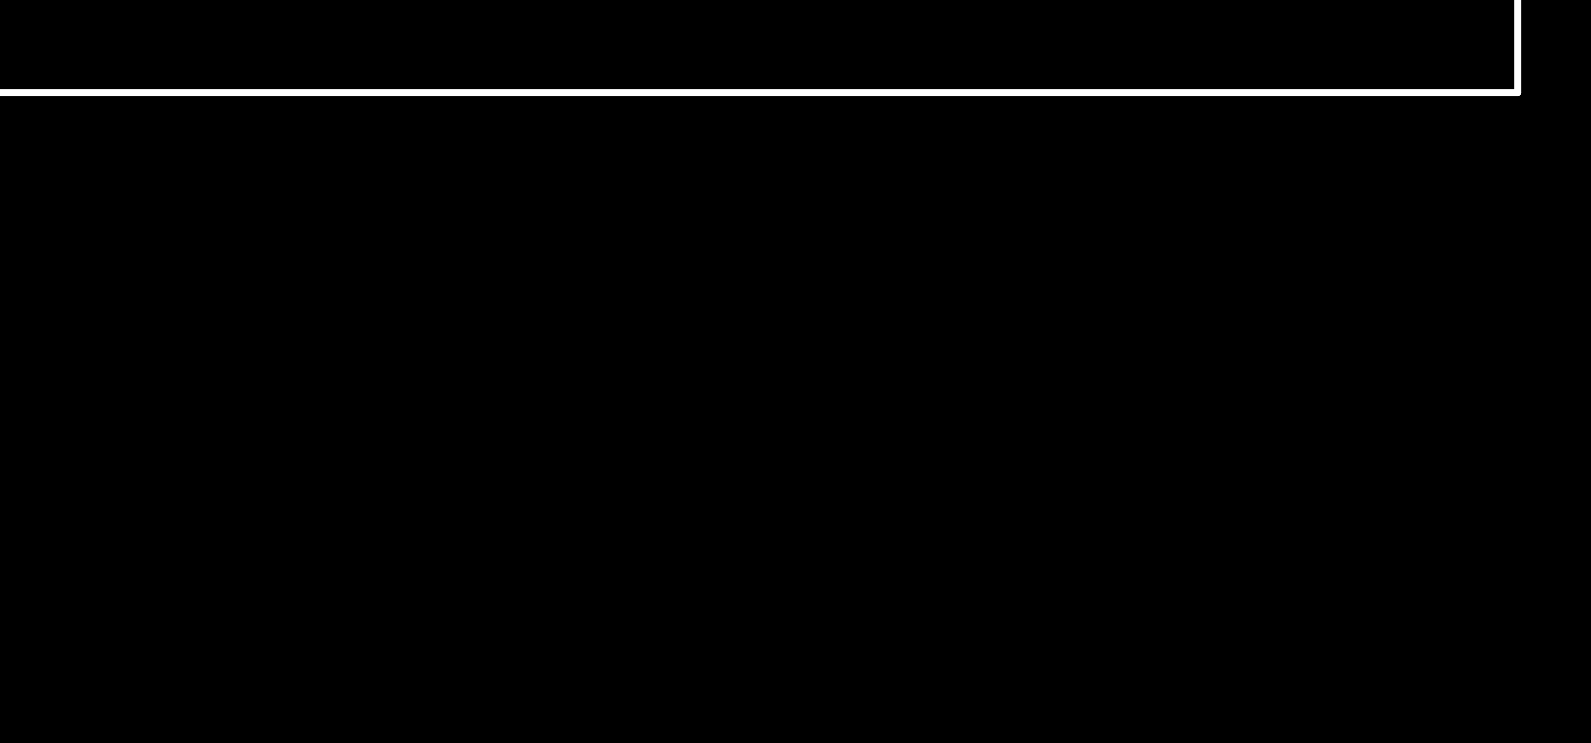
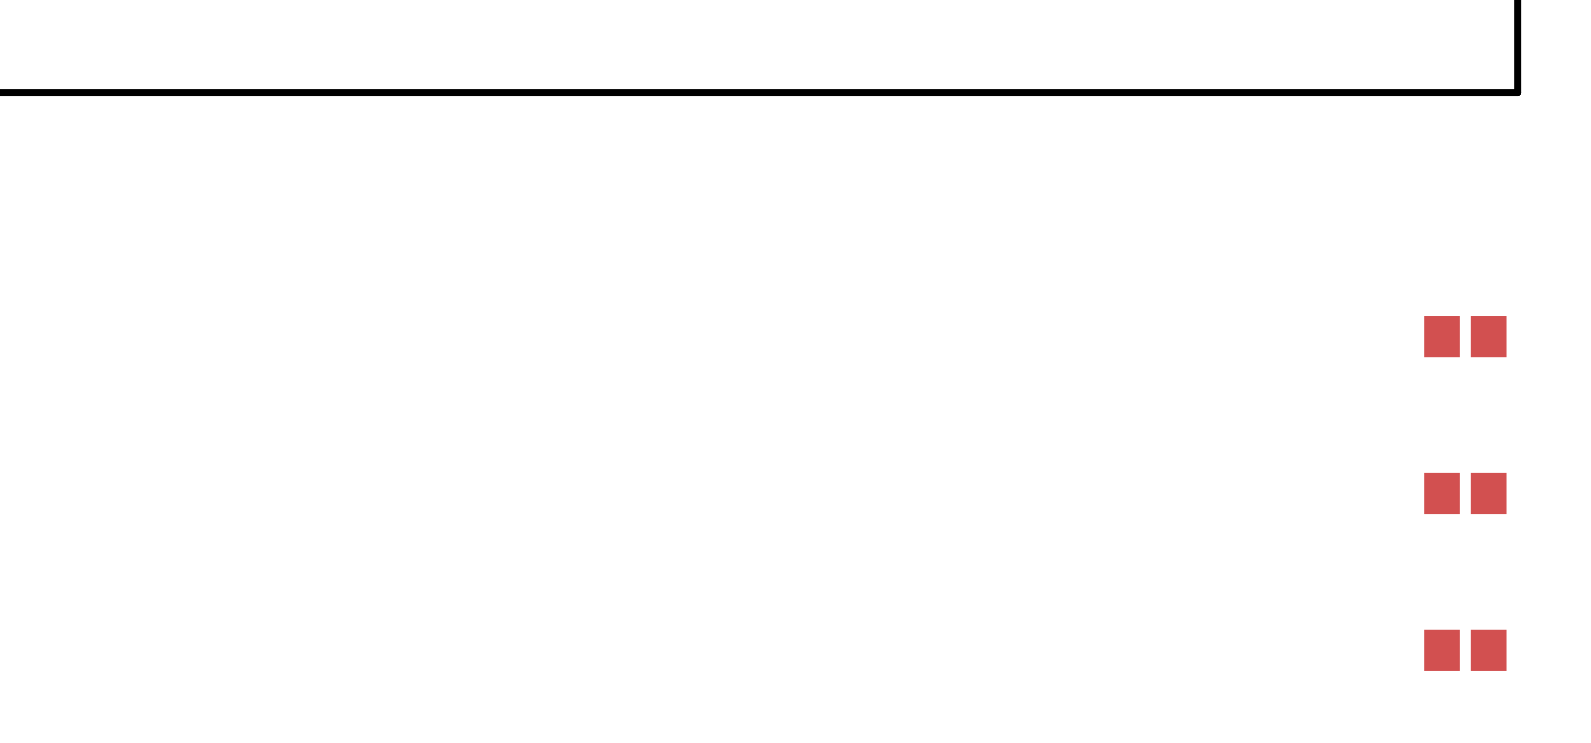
part: none -> (1465, 336)
part: none -> (1465, 493)
part: none -> (1465, 650)

